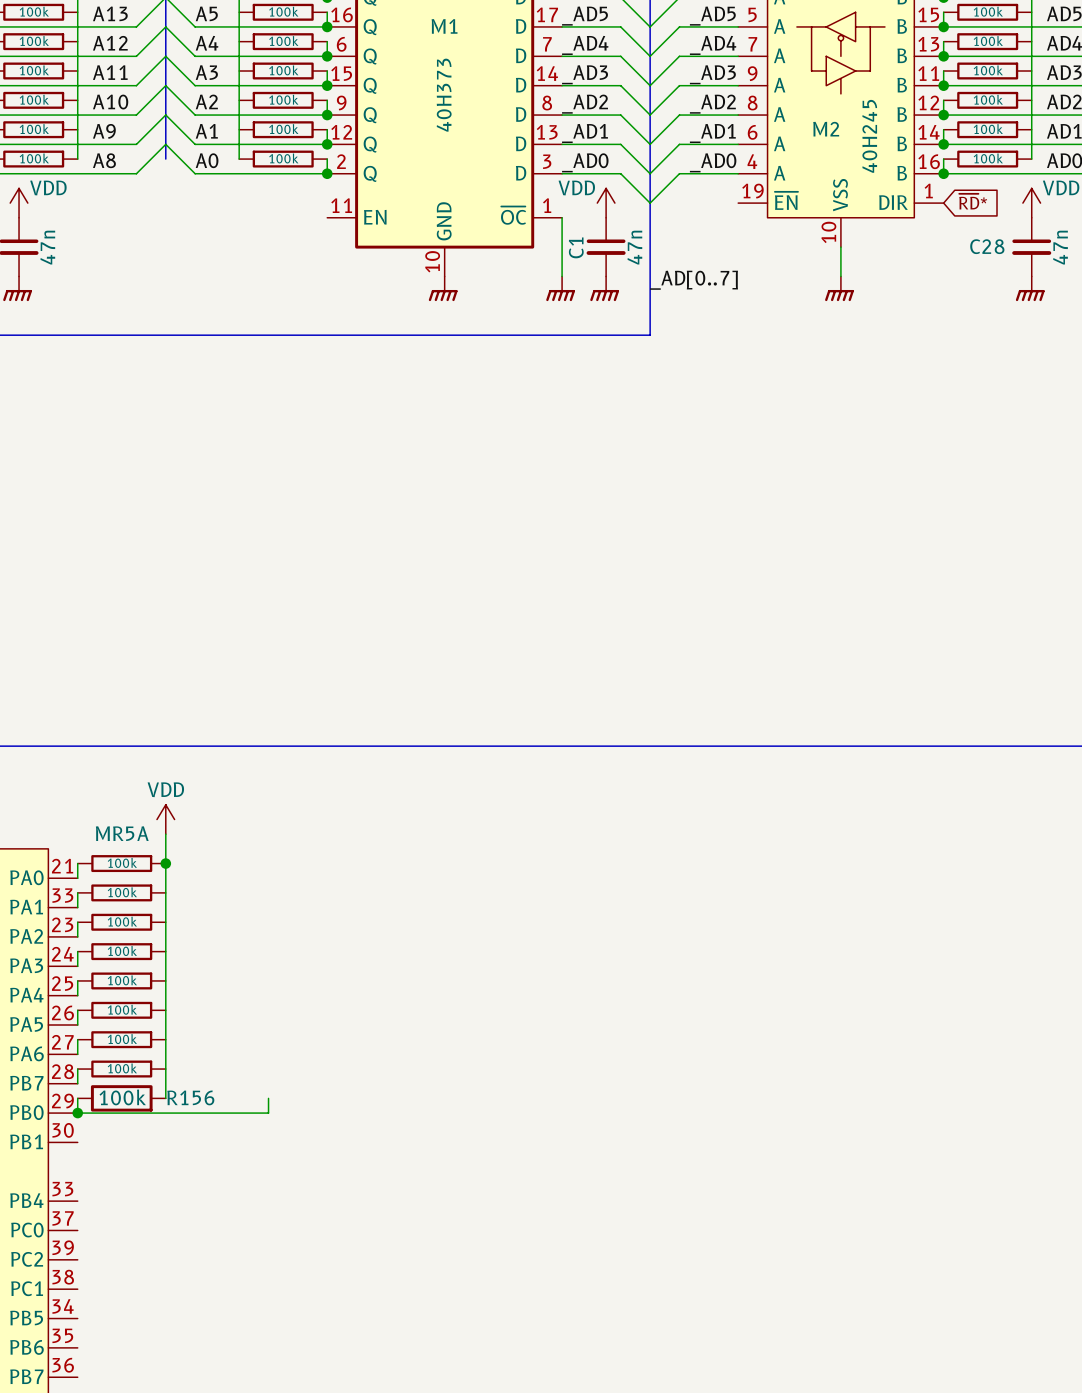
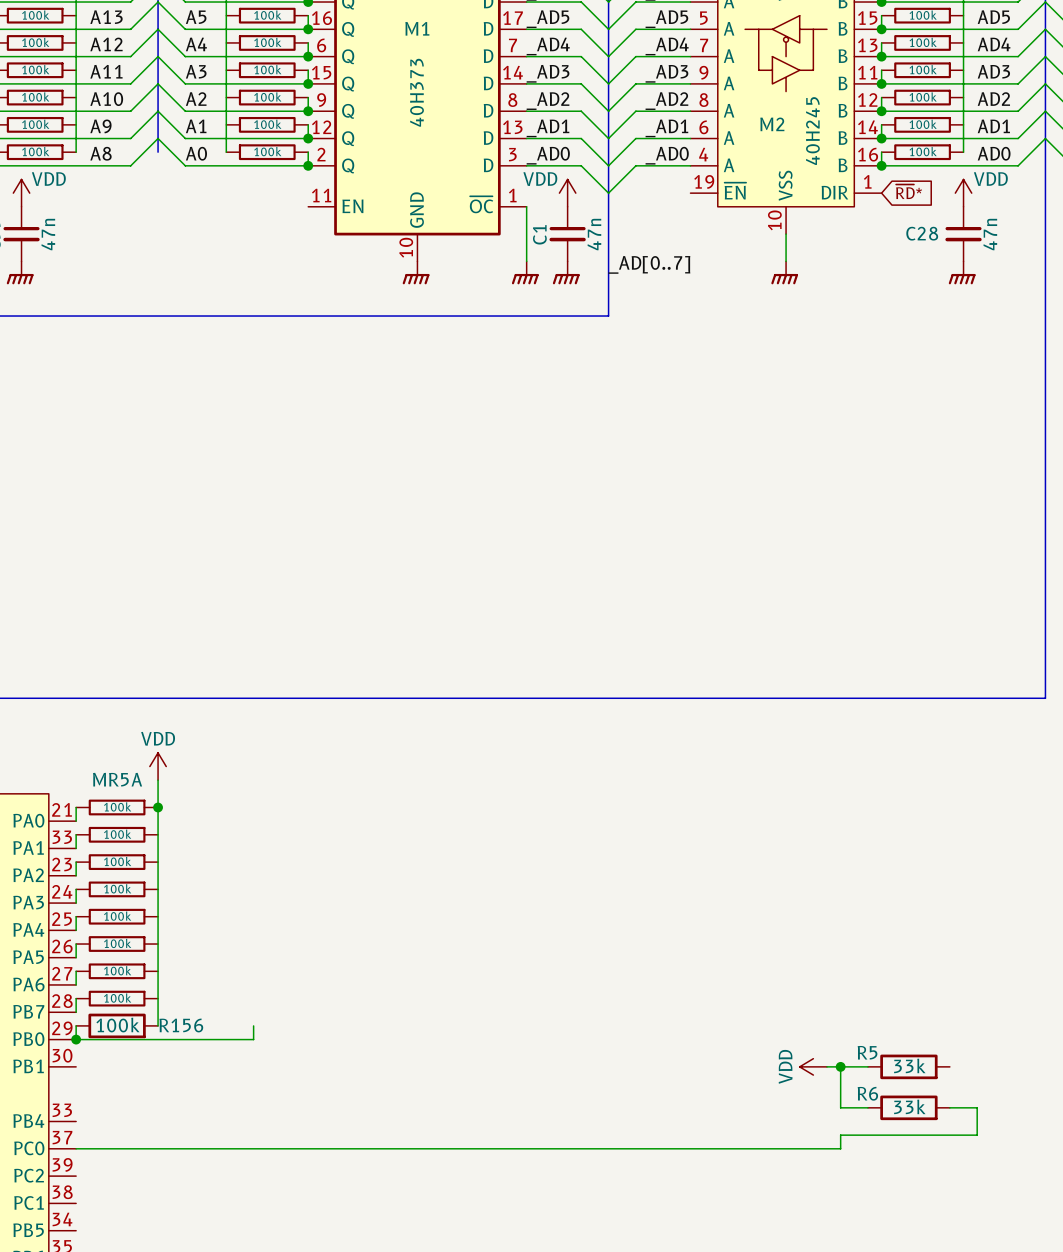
power symbol: none -> VDD (813, 1066)
wire: none -> (827, 1066) (867, 1066)
wire: none -> (840, 1066) (840, 1107) (867, 1107)
junction: none -> (840, 1066)
R5: none -> 33k (908, 1066)
R6: none -> 33k (908, 1107)
wire: none -> (949, 1107) (977, 1107) (977, 1135) (840, 1135) (840, 1148) (76, 1148)

